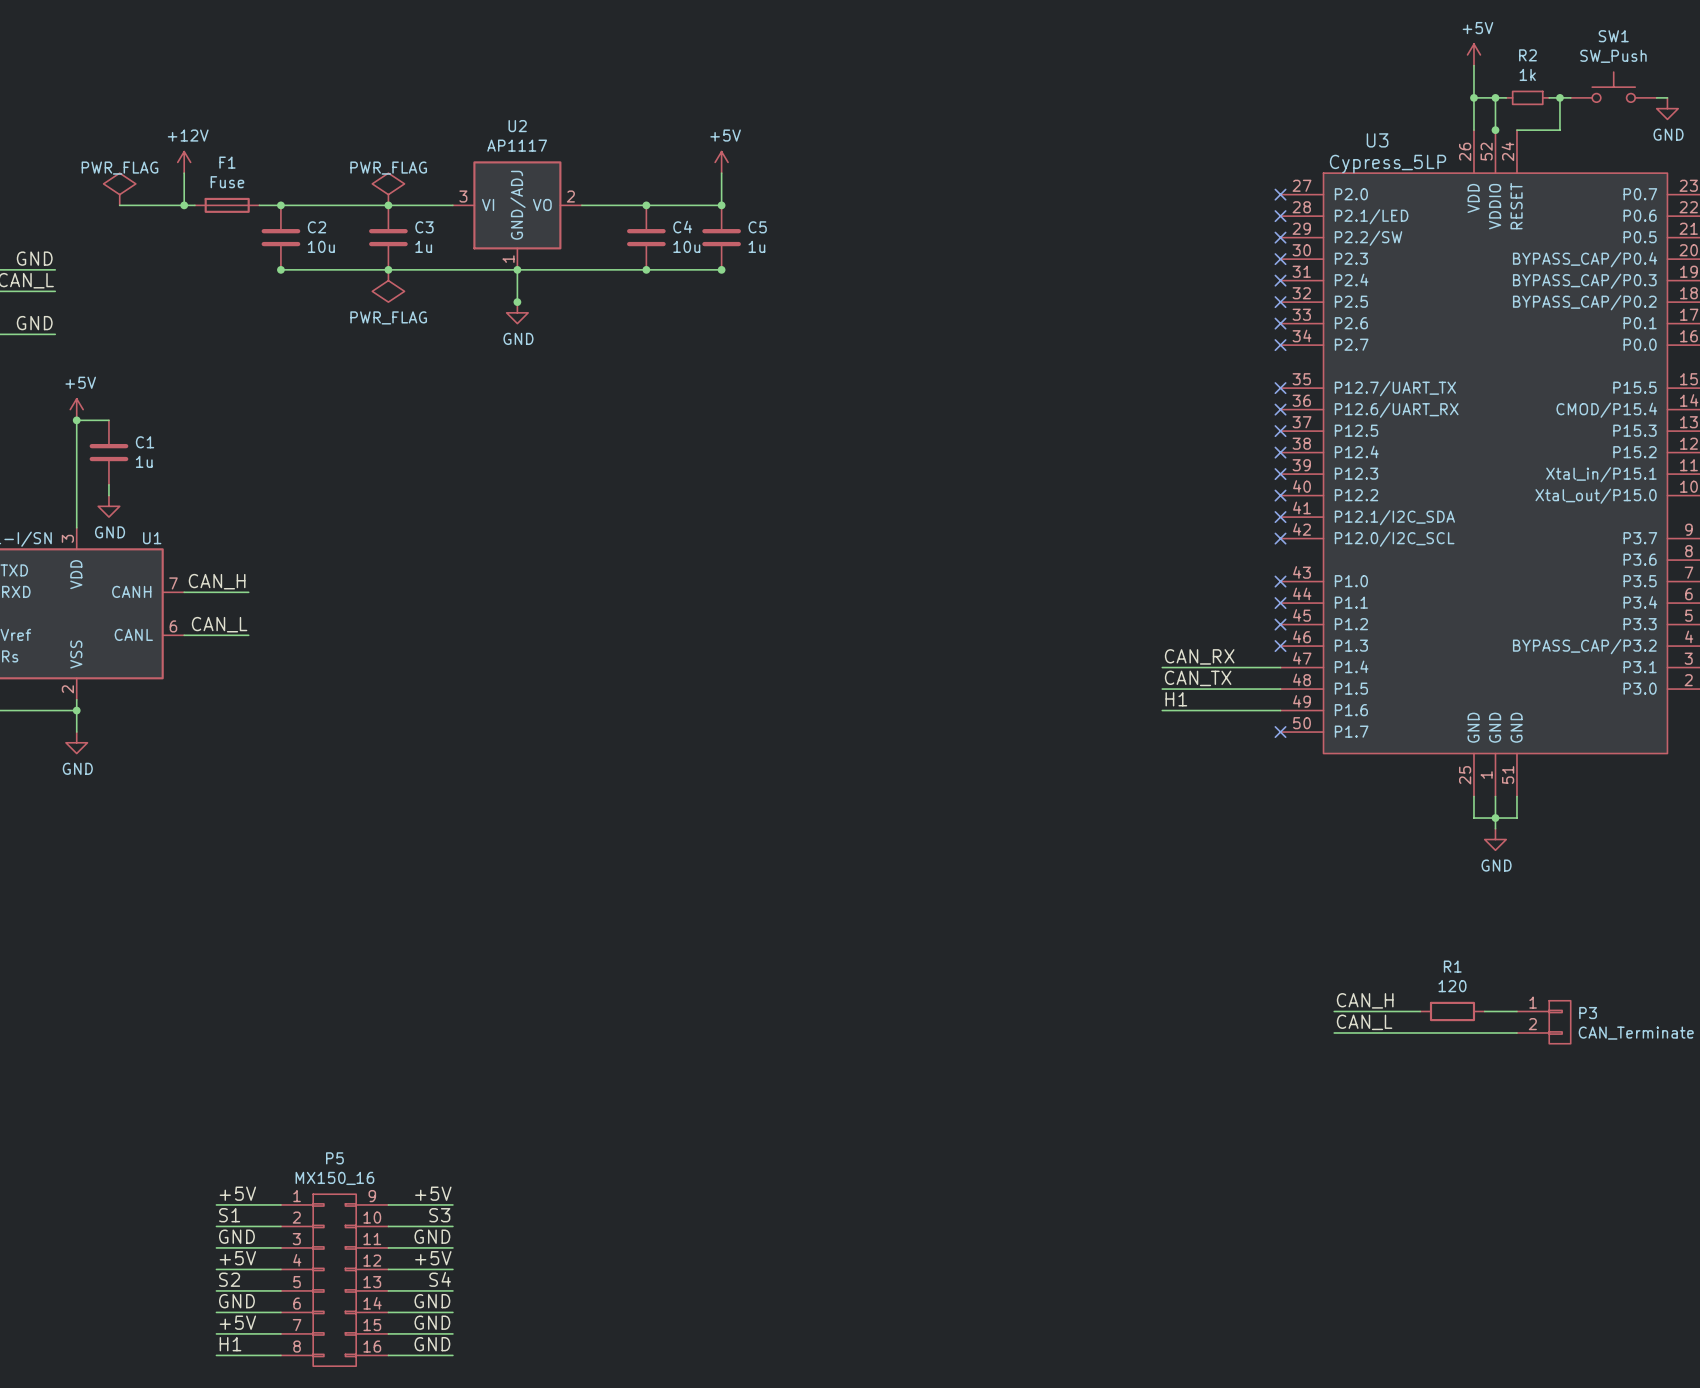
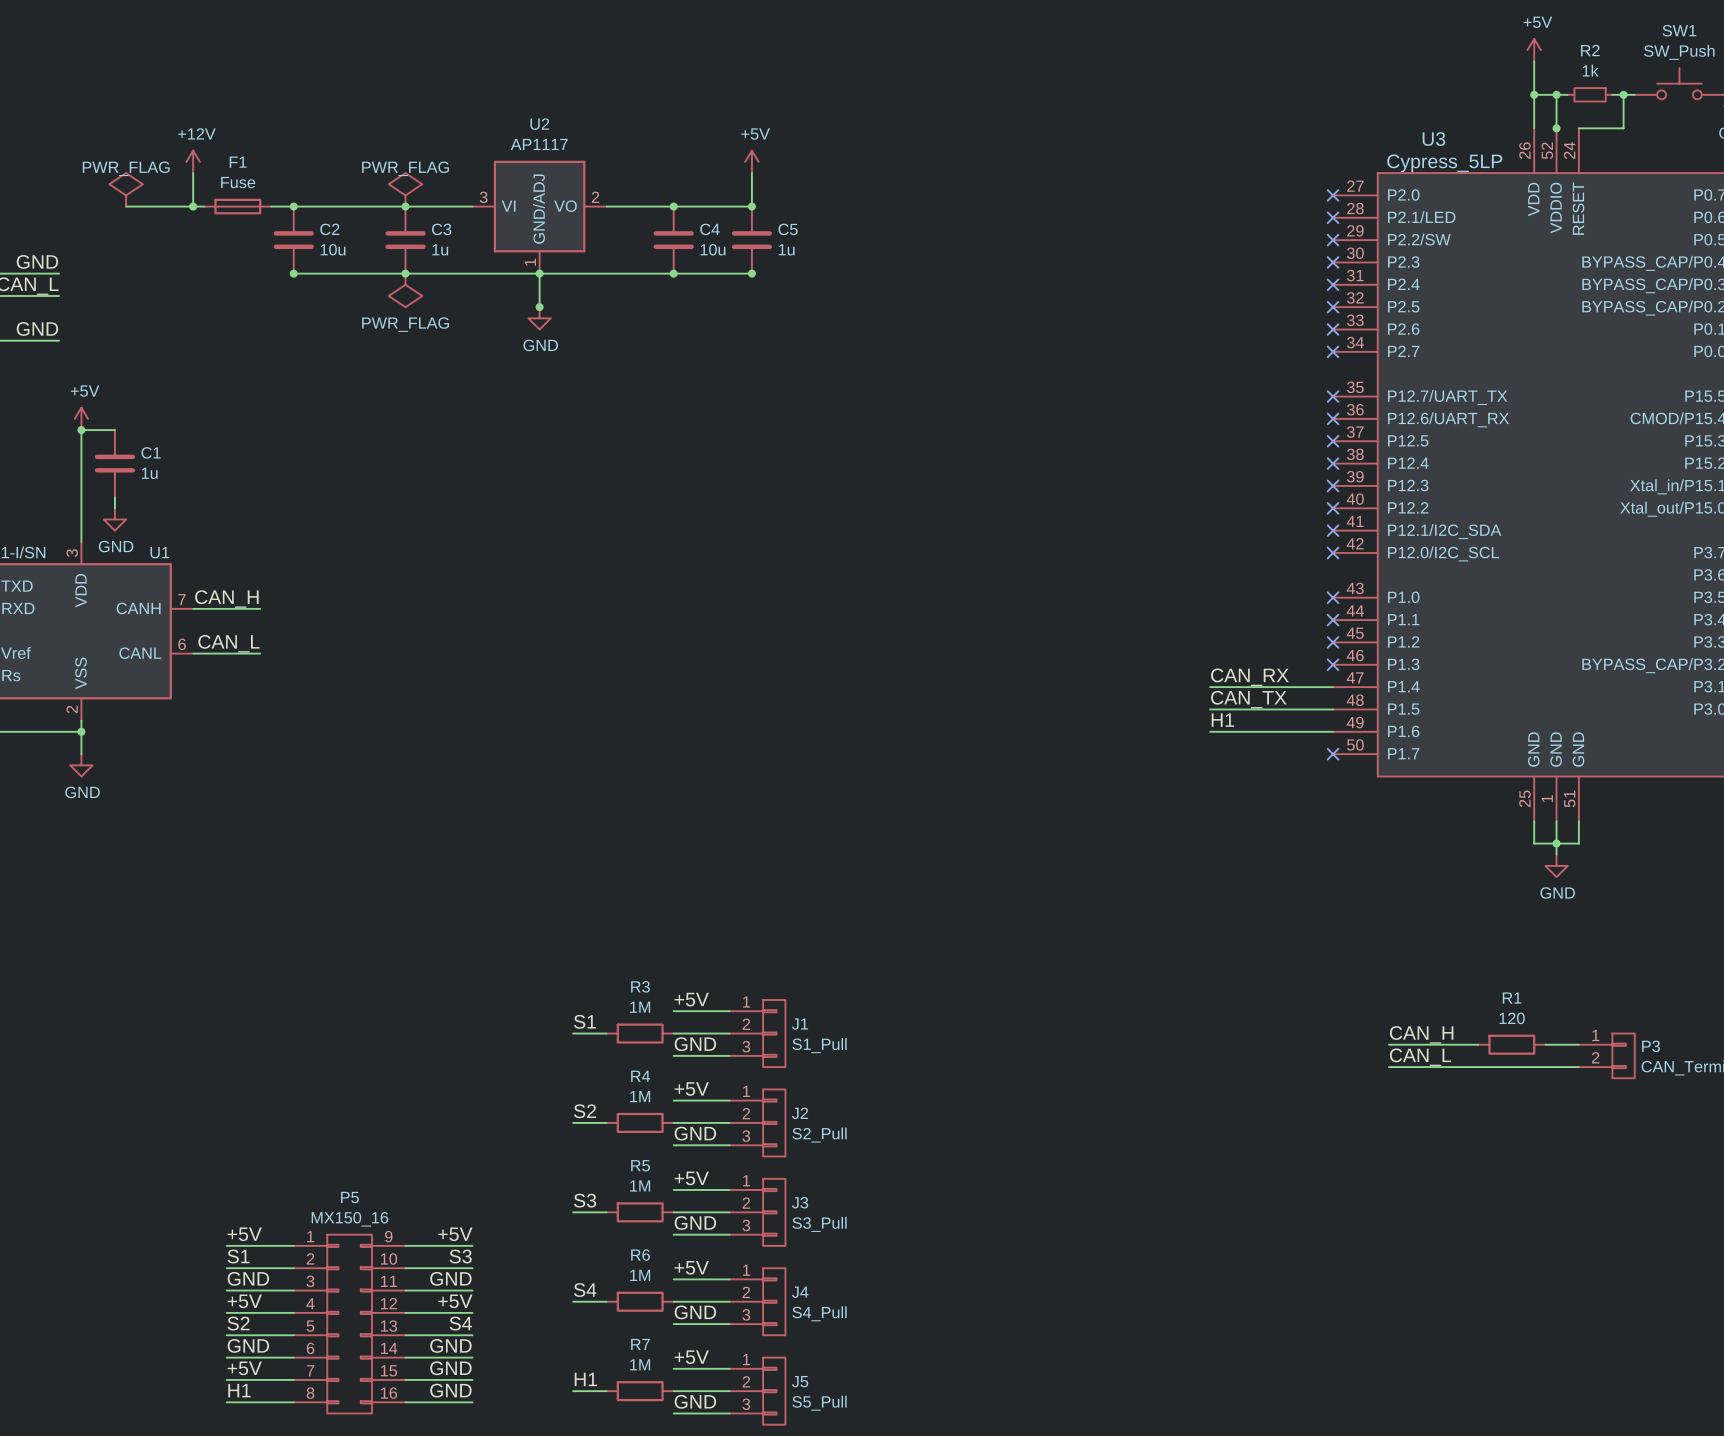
label: none -> +5V (691, 999)
wire: none -> (673, 1011) (729, 1011)
label: none -> S1 (585, 1021)
wire: none -> (573, 1033) (606, 1033)
R3: none -> 1M (640, 1033)
wire: none -> (673, 1033) (729, 1033)
J1: none -> S1_Pull (757, 1033)
label: none -> GND (695, 1044)
wire: none -> (673, 1055) (729, 1055)
label: none -> +5V (691, 1088)
wire: none -> (673, 1100) (729, 1100)
label: none -> S2 (585, 1111)
wire: none -> (573, 1122) (606, 1122)
R4: none -> 1M (640, 1122)
wire: none -> (673, 1122) (729, 1122)
J2: none -> S2_Pull (757, 1122)
label: none -> GND (695, 1133)
wire: none -> (673, 1145) (729, 1145)
label: none -> +5V (691, 1178)
wire: none -> (673, 1189) (729, 1189)
label: none -> S3 (585, 1200)
wire: none -> (573, 1212) (606, 1212)
R5: none -> 1M (640, 1212)
wire: none -> (673, 1212) (729, 1212)
J3: none -> S3_Pull (757, 1212)
label: none -> GND (695, 1222)
wire: none -> (673, 1234) (729, 1234)
label: none -> +5V (691, 1267)
wire: none -> (673, 1279) (729, 1279)
label: none -> S4 (585, 1290)
wire: none -> (573, 1301) (606, 1301)
R6: none -> 1M (640, 1301)
wire: none -> (673, 1301) (729, 1301)
J4: none -> S4_Pull (757, 1301)
label: none -> GND (695, 1312)
wire: none -> (673, 1324) (729, 1324)
label: none -> +5V (691, 1357)
wire: none -> (673, 1368) (729, 1368)
label: none -> H1 (585, 1379)
wire: none -> (573, 1391) (606, 1391)
R7: none -> 1M (640, 1391)
wire: none -> (673, 1391) (729, 1391)
J5: none -> S5_Pull (757, 1391)
label: none -> GND (695, 1401)
wire: none -> (673, 1413) (729, 1413)

